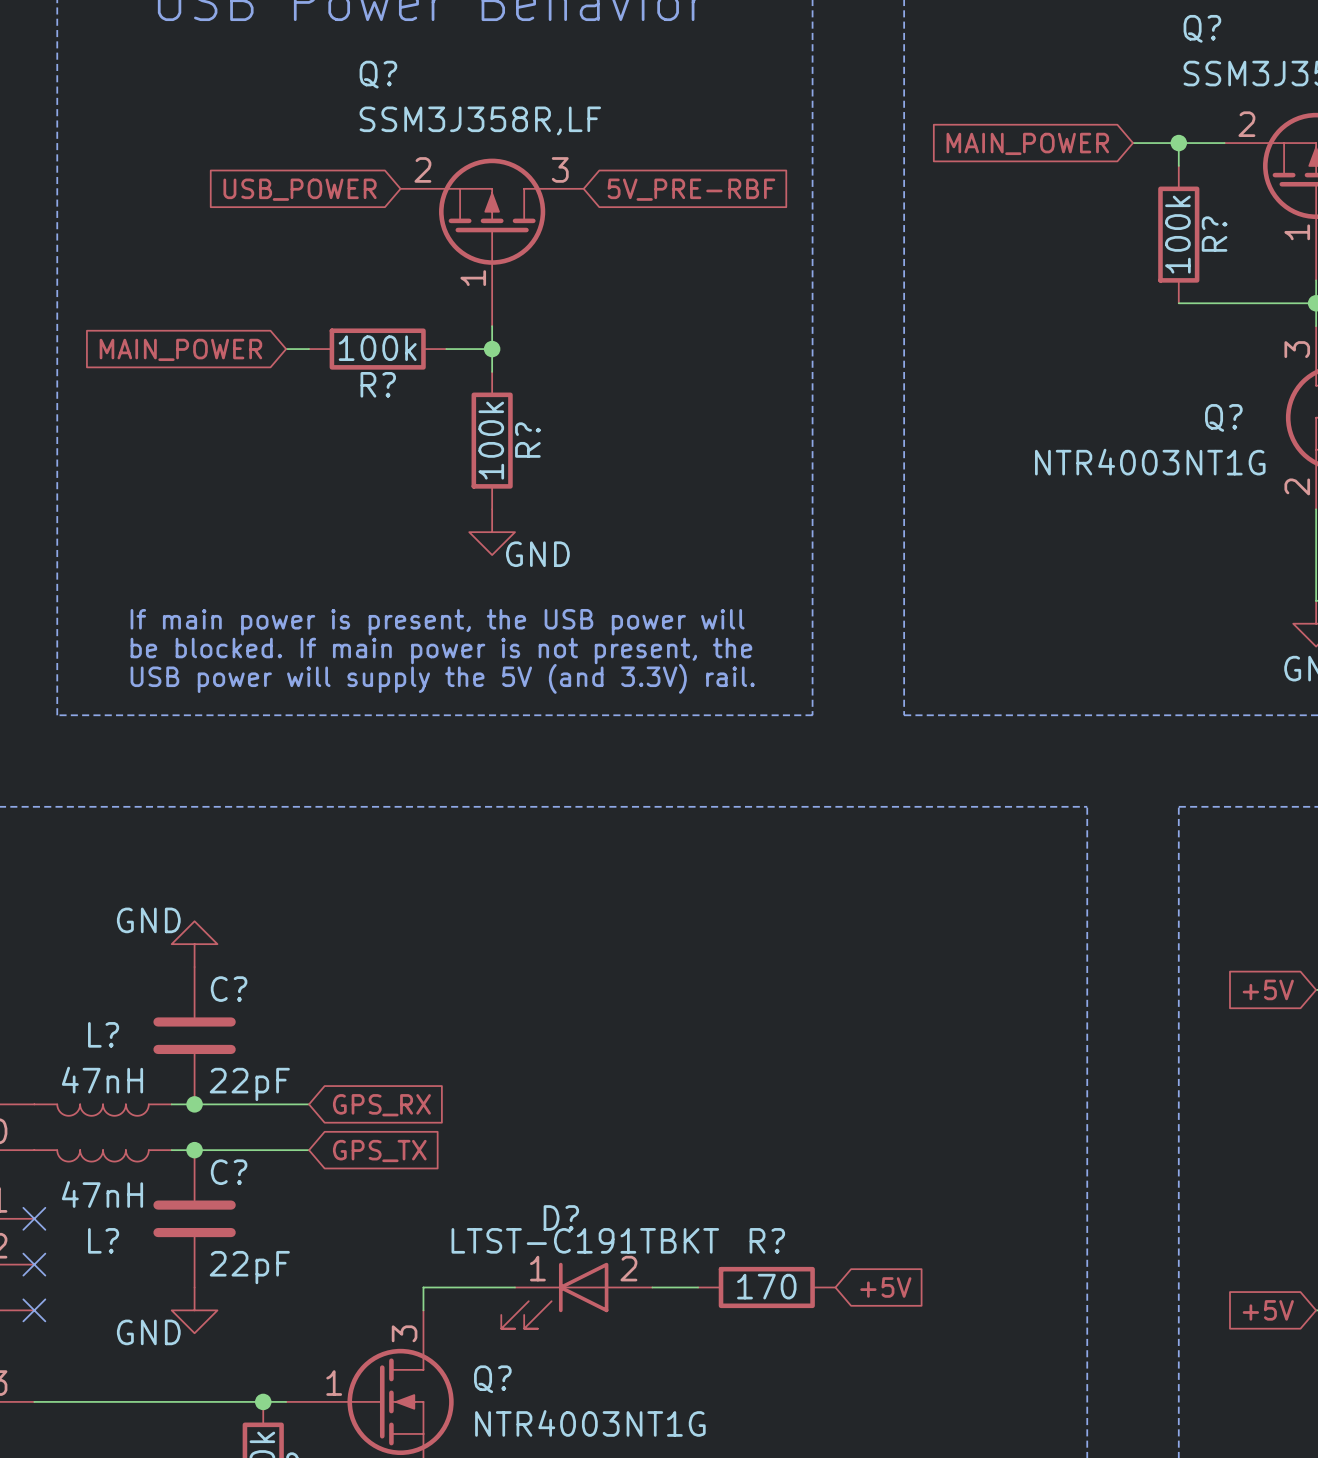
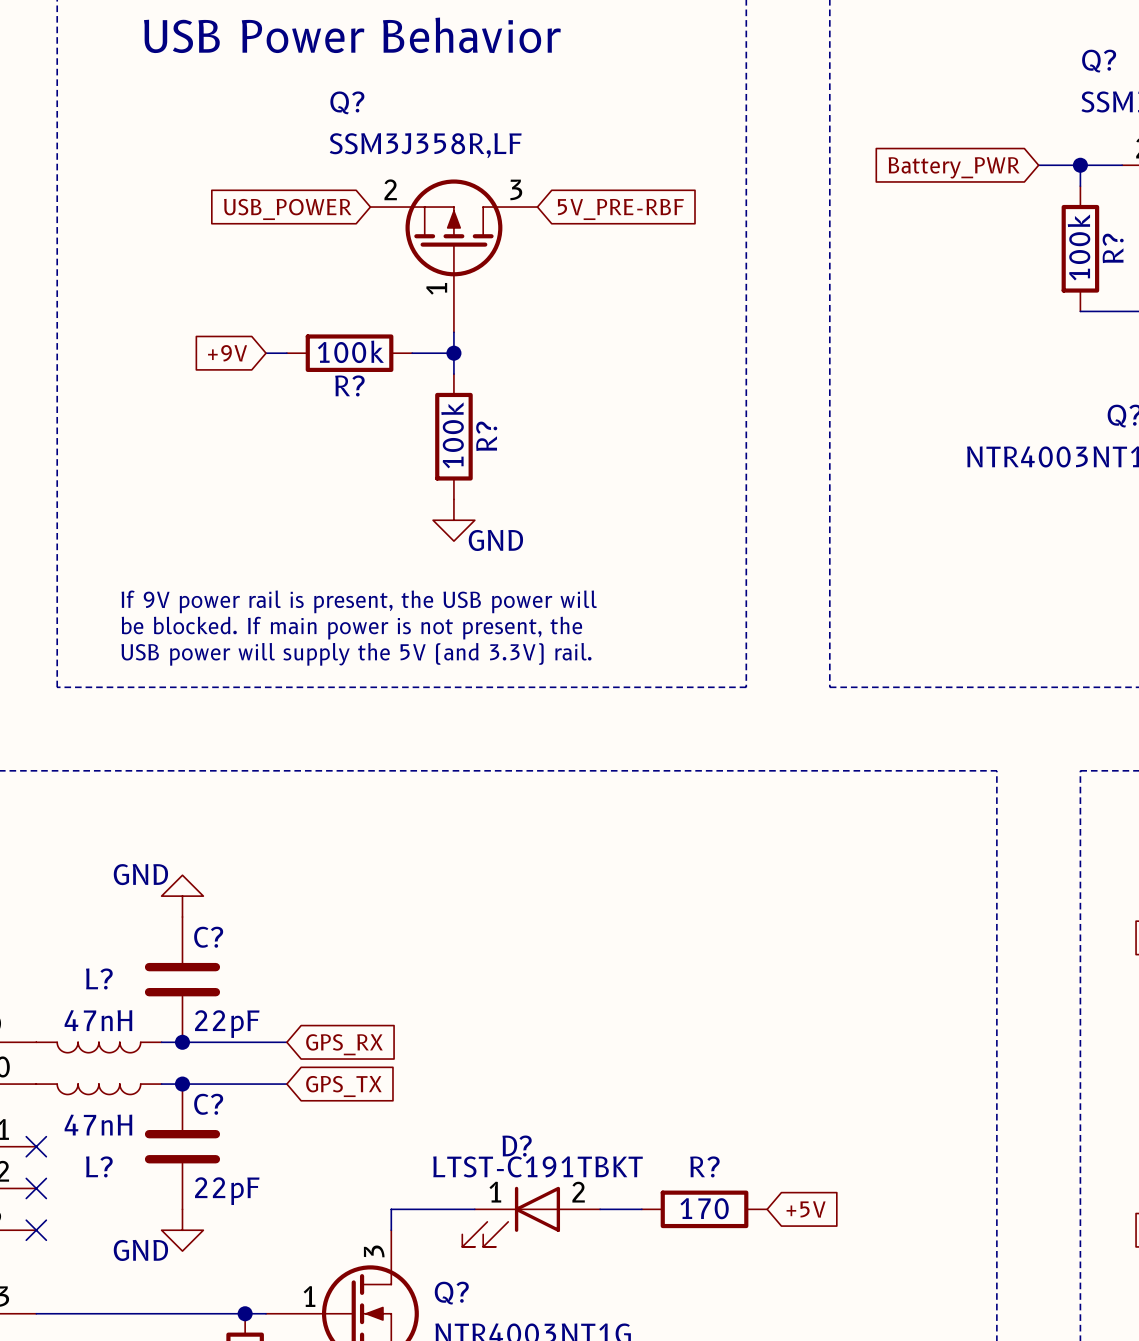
global label: MAIN_POWER (1027, 143) -> Battery_PWR (954, 167)
global label: MAIN_POWER (180, 349) -> +9V (227, 353)
text: If main power is present, the USB power will (437, 622) -> If 9V power rail is present, the USB power will (359, 601)

